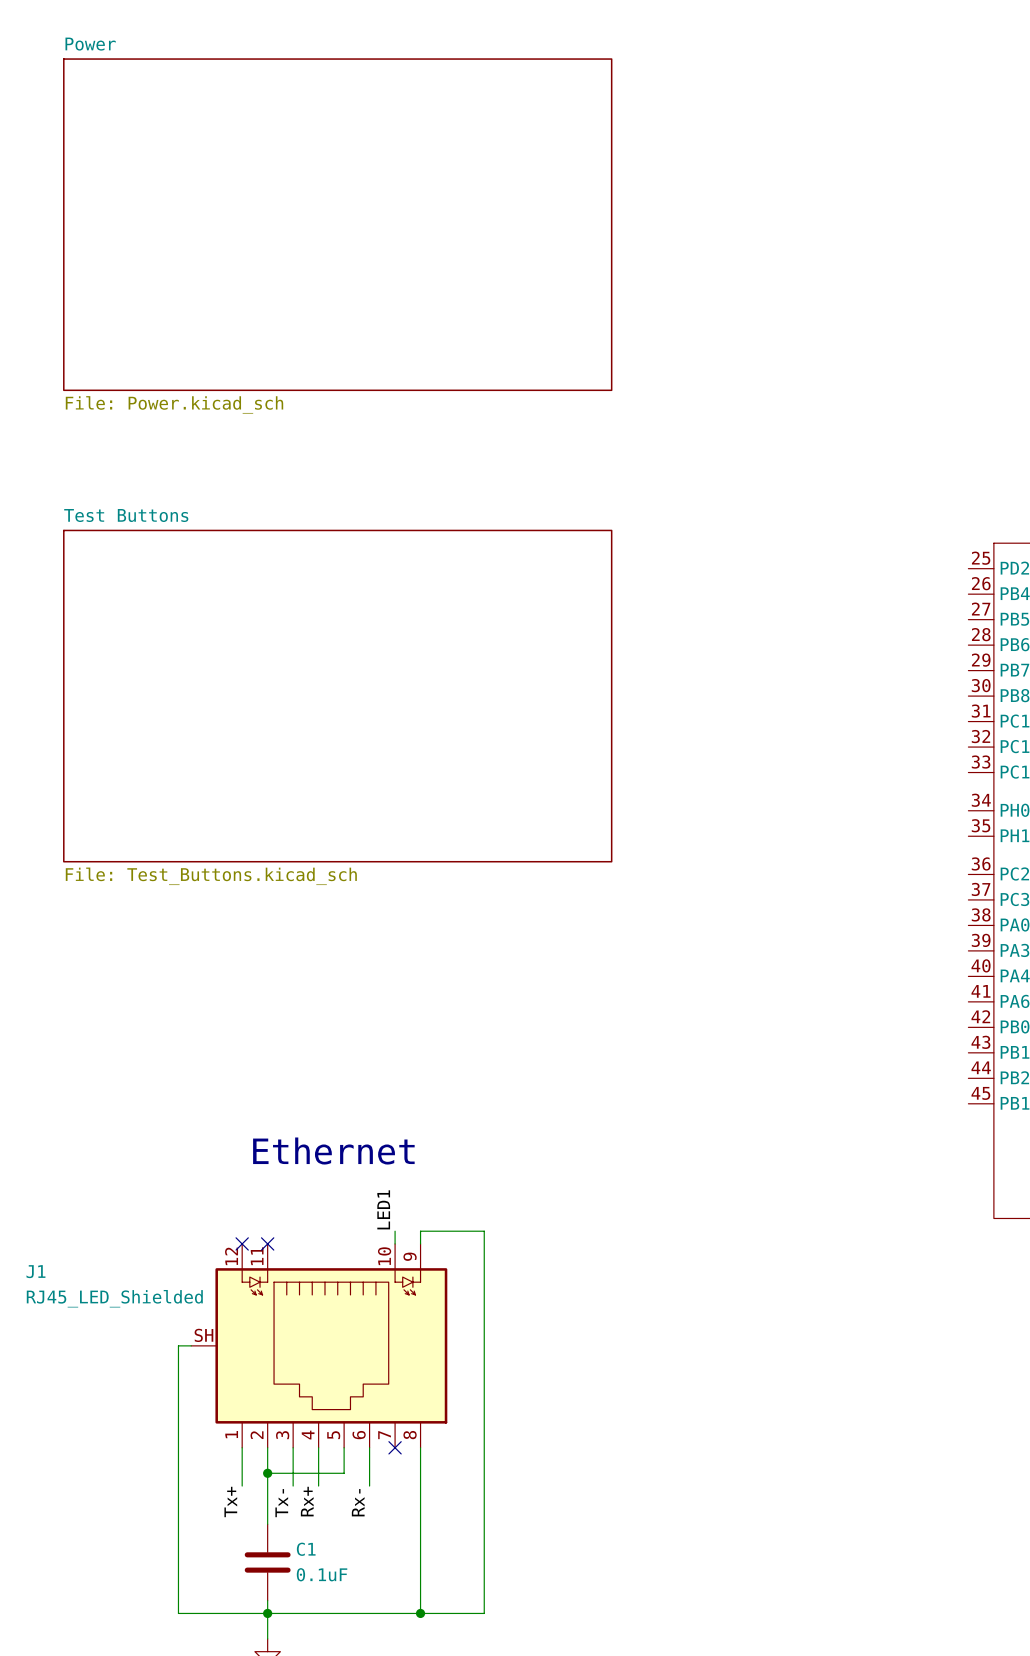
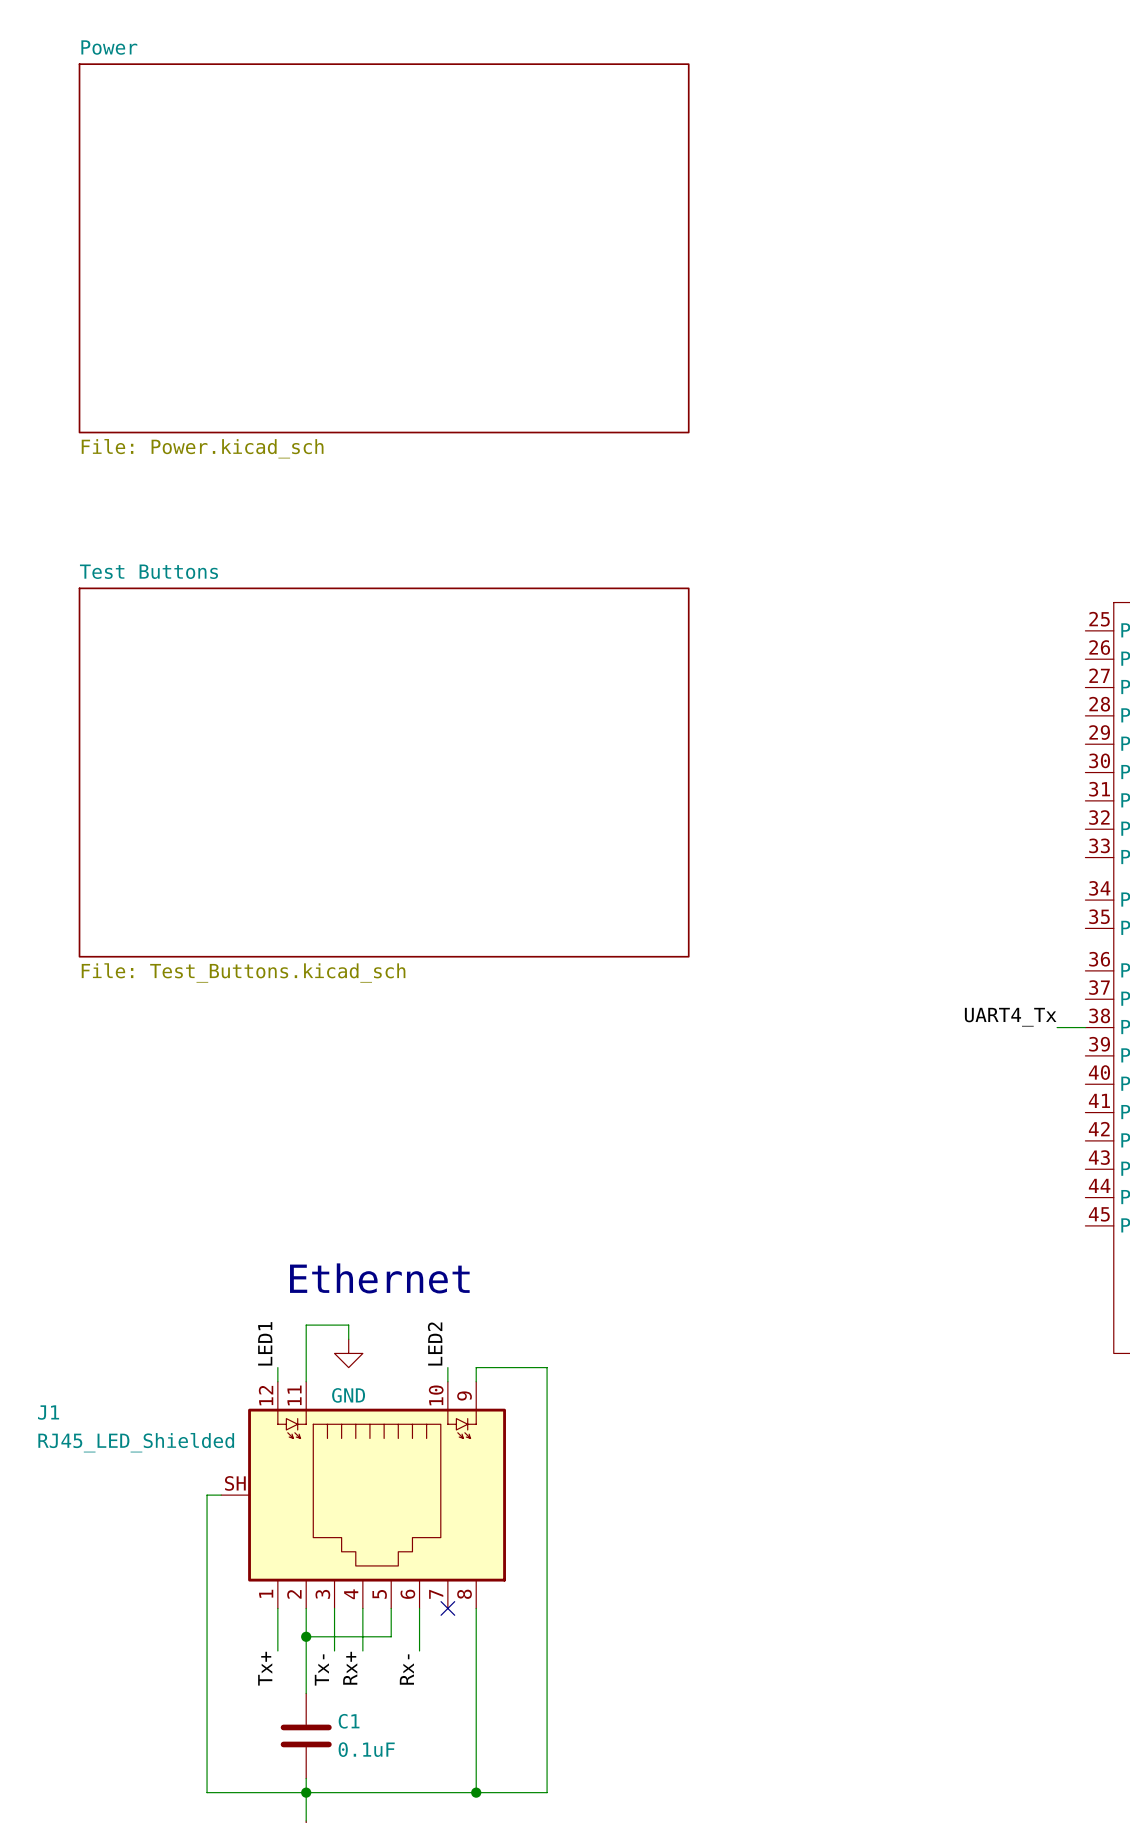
label: none -> UART4_Tx (1010, 1017)
wire: none -> (1057, 1027) (1085, 1027)
wire: none -> (348, 1339) (348, 1325) (306, 1325) (306, 1381)
label: none -> LED1 (265, 1343)
label: LED1 (383, 1209) -> LED2 (435, 1344)
power symbol: none -> GND (348, 1353)
wire: none -> (277, 1367) (277, 1381)
no-connect mark: (242, 1243) -> none
no-connect mark: (267, 1243) -> none

